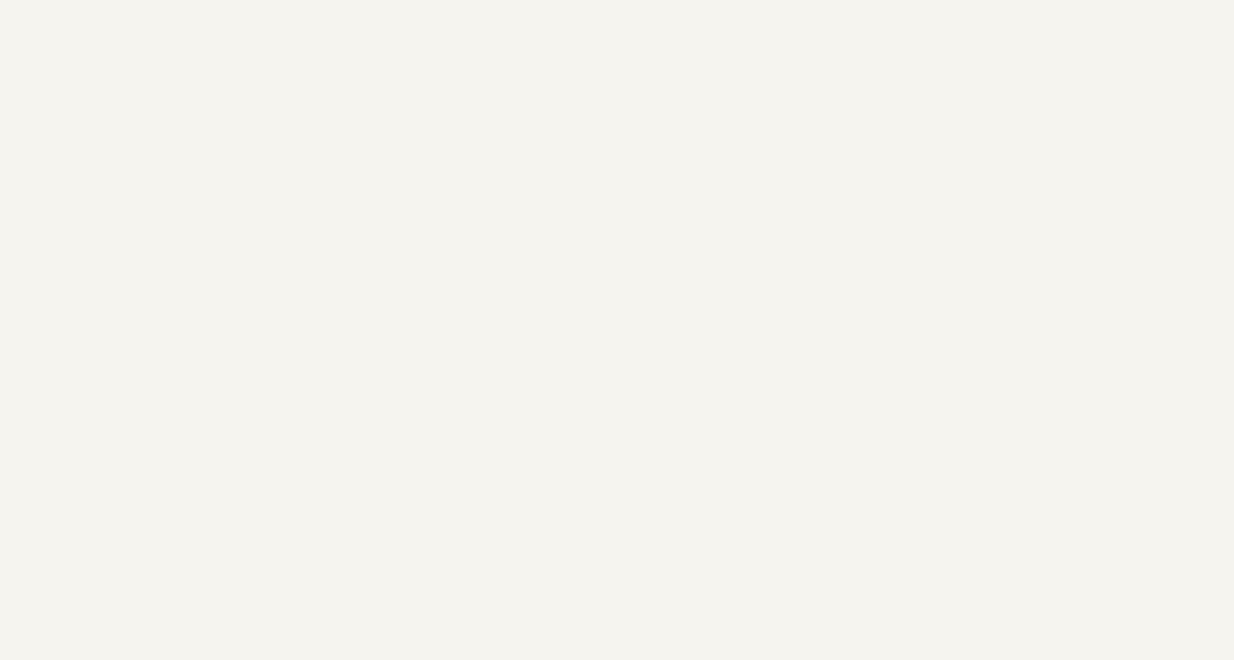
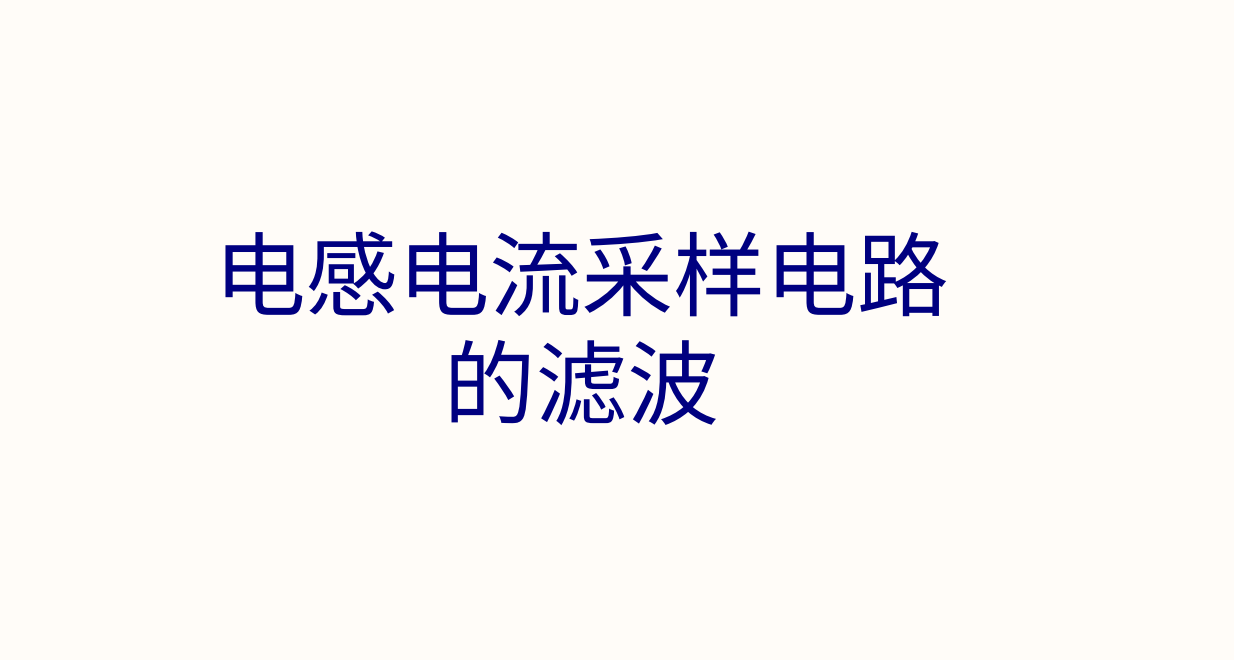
text: none -> 电感电流采样电路 (585, 273)
text: none -> 的滤波 (583, 382)

